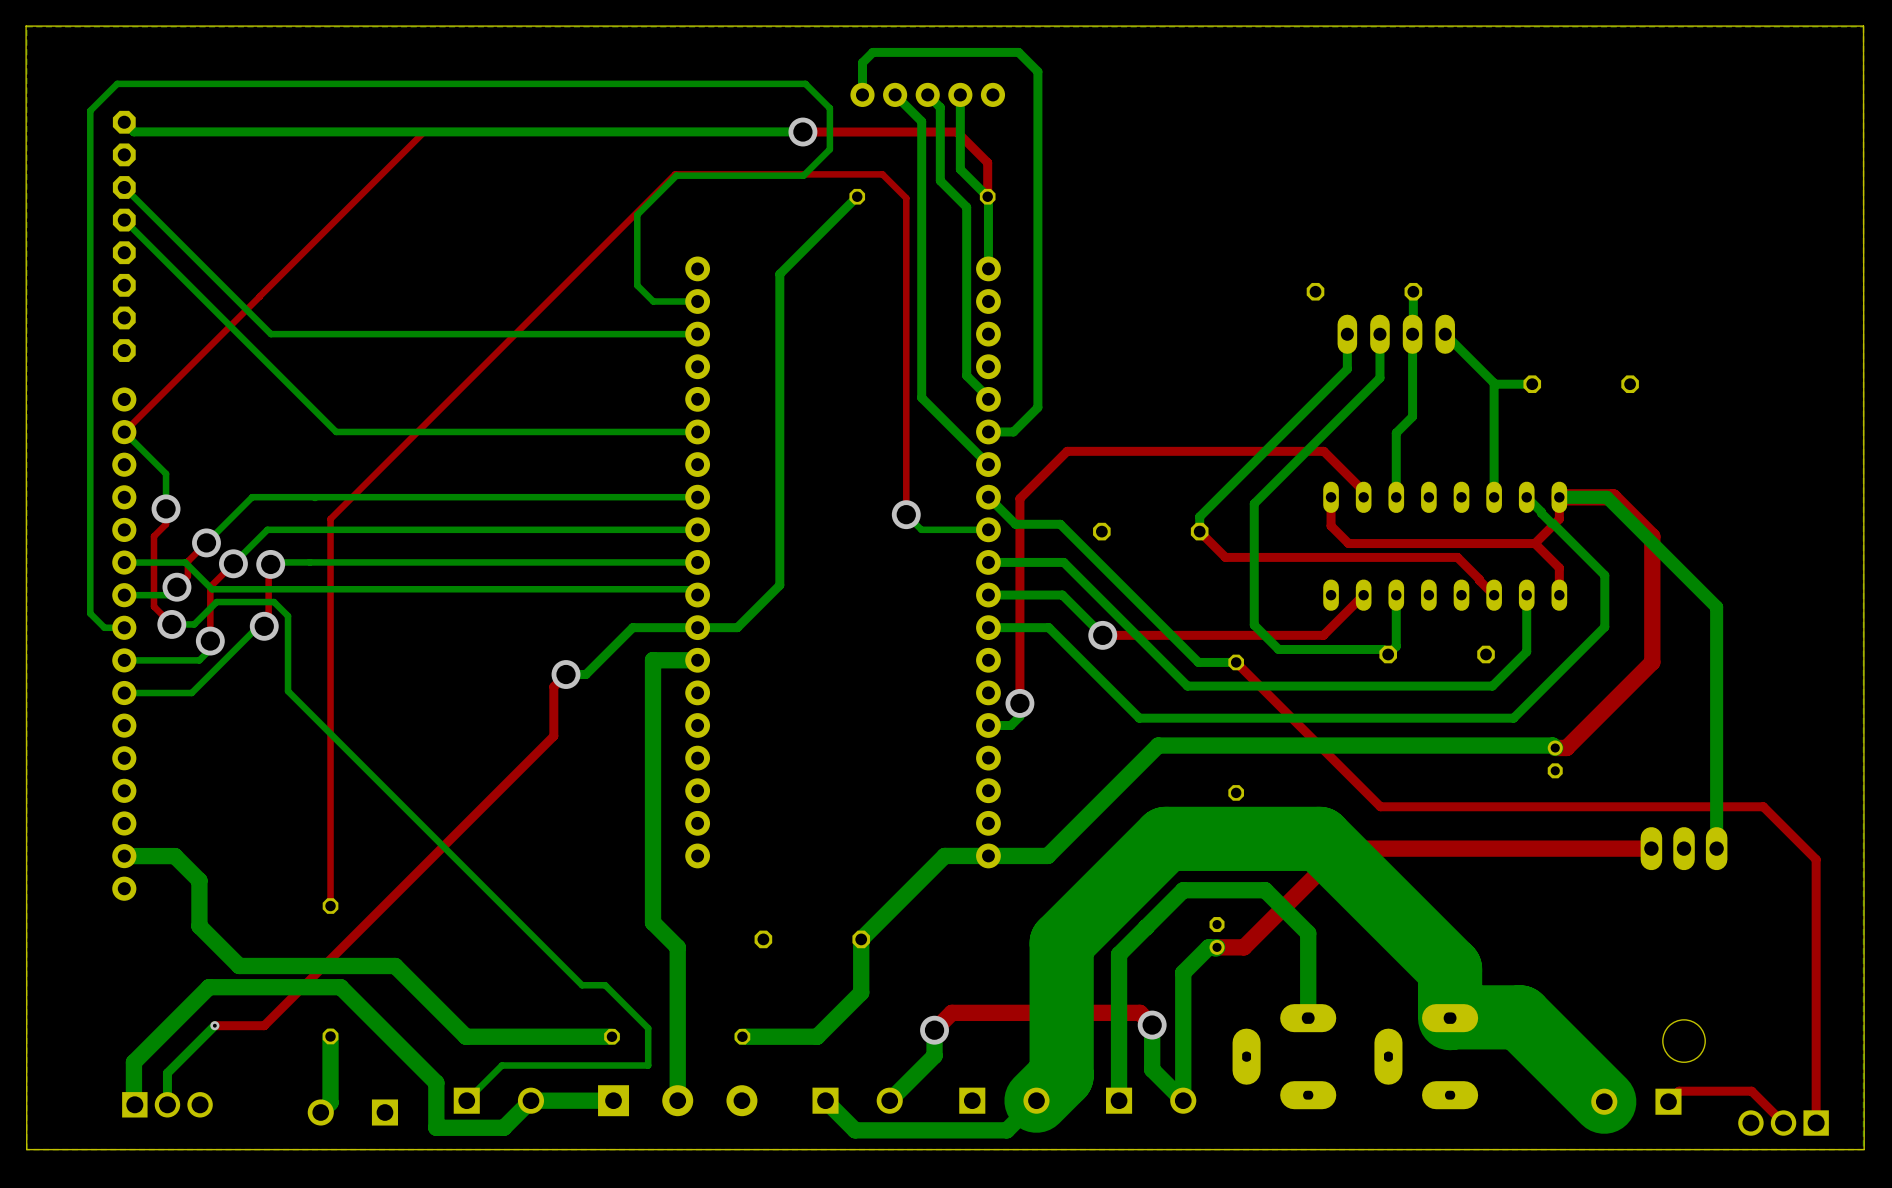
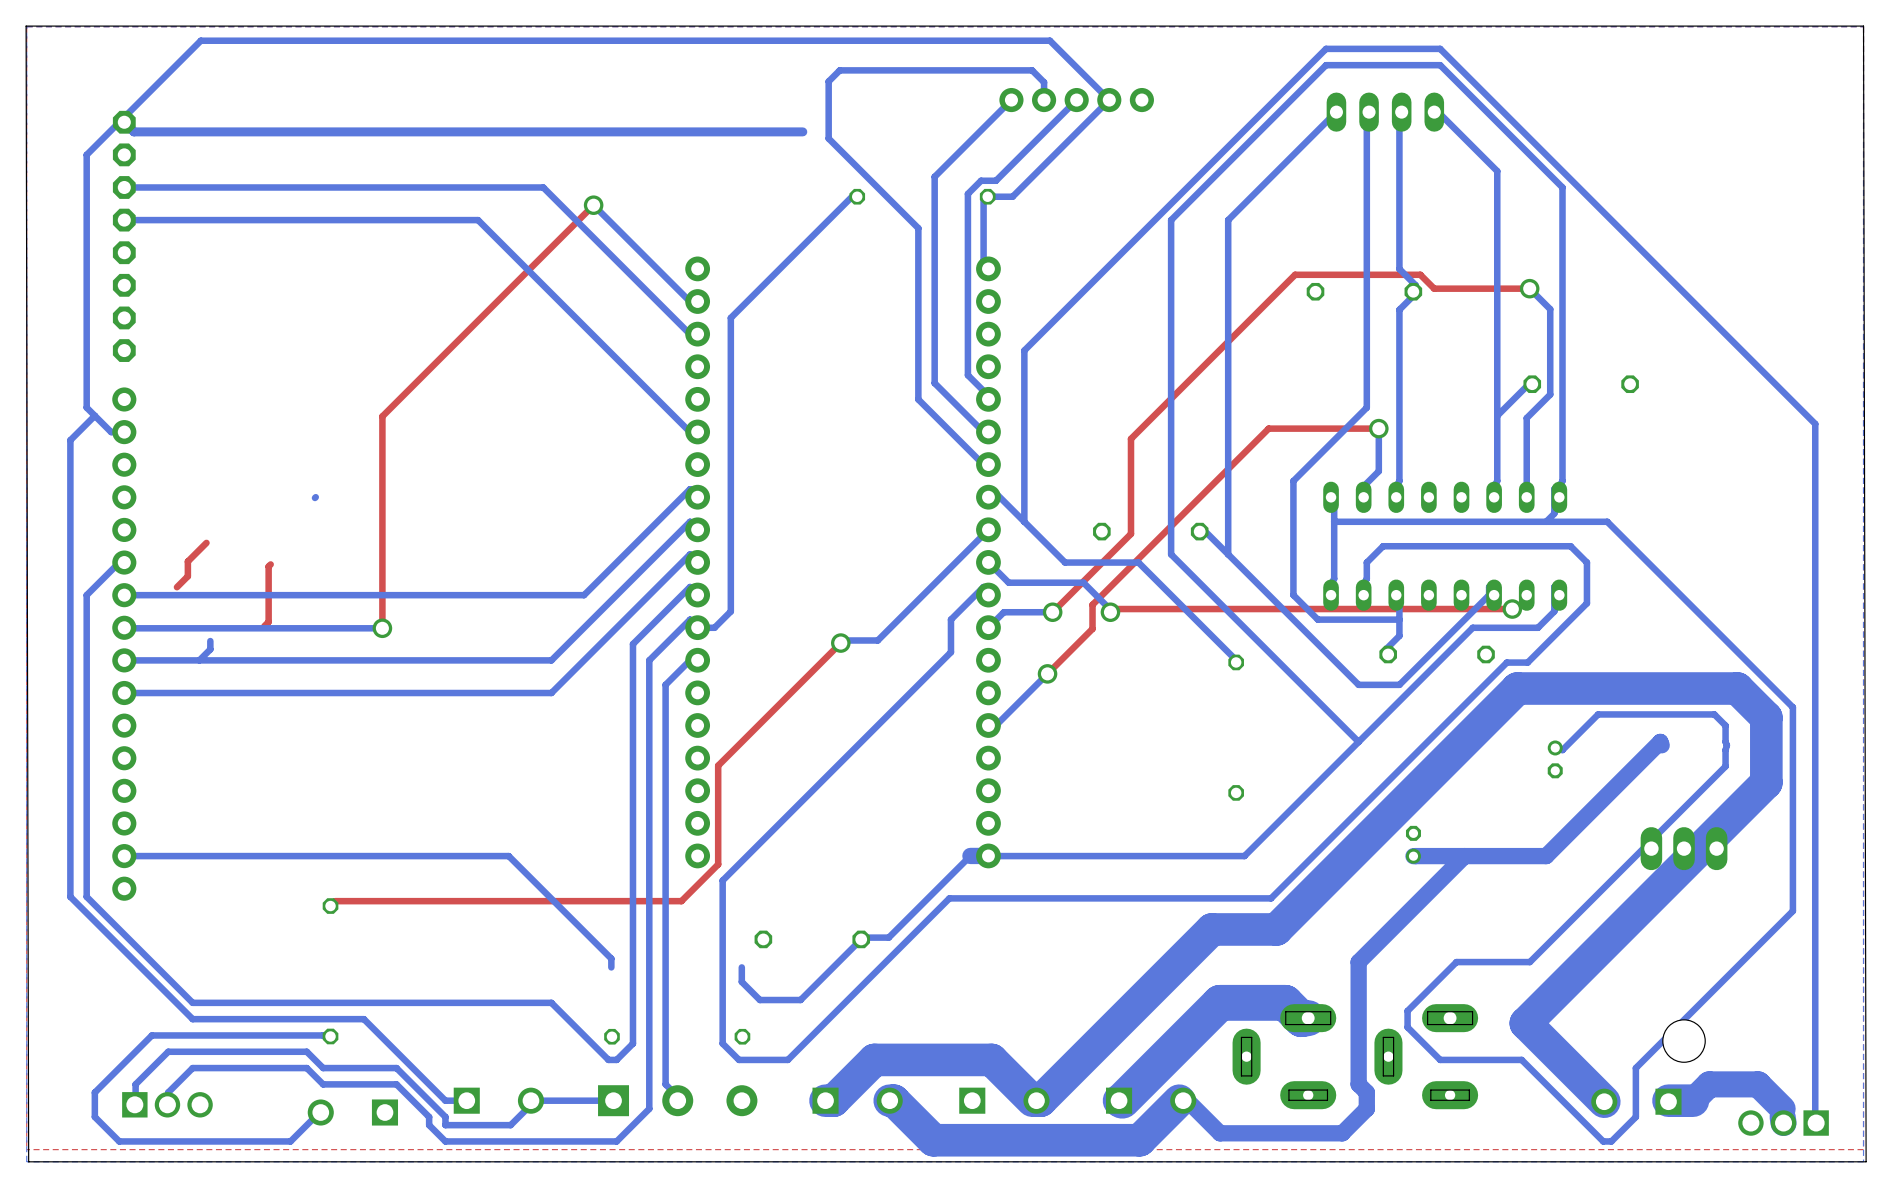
board edge: (1863, 26) (1864, 1149) (26, 1149) (26, 26) -> (1863, 26) (1866, 1161) (28, 1161) (26, 26)
bottom track: (862, 94) (862, 62) (872, 52) (1018, 52) (1037, 71) (1037, 407) (1013, 431) (988, 431) -> (1011, 100) (934, 176) (934, 383) (983, 432) (988, 431)
bottom track: (895, 94) (921, 121) (921, 397) (988, 464) -> (1044, 100) (1044, 82) (1032, 70) (839, 70) (828, 81) (828, 138) (918, 228) (918, 399) (983, 464) (988, 464)
bottom track: (927, 94) (940, 107) (940, 180) (966, 207) (966, 375) (988, 397) -> (1076, 100) (995, 180) (981, 180) (967, 193) (967, 375) (988, 397)
part position: (927, 94) -> (1076, 100)
bottom track: (960, 94) (960, 169) (988, 197) (988, 268) -> none
bottom track: none -> (1336, 112) (1228, 220) (1228, 554)
bottom track: none -> (1369, 112) (1366, 114) (1366, 407) (1293, 481) (1293, 595) (1317, 619) (1399, 619)
bottom track: none -> (1401, 112) (1399, 114) (1399, 269) (1415, 285) (1413, 291) (1415, 293) (1399, 309) (1399, 481) (1396, 486)
bottom track: none -> (1434, 112) (1440, 114) (1497, 171) (1497, 481) (1494, 486)
via: (802, 132) -> none
bottom track: (124, 187) (270, 334) (697, 334) -> (124, 187) (543, 187) (690, 334) (697, 334)
bottom track: (857, 196) (779, 274) (779, 585) (737, 627) (632, 627) (585, 674) (566, 674) -> (857, 196) (853, 195) (730, 317) (730, 611) (714, 627) (697, 627) (690, 619) (649, 660) (649, 1108) (616, 1141) (445, 1141) (429, 1125) (429, 1117) (396, 1084) (323, 1084) (306, 1068) (192, 1068) (168, 1092) (167, 1104)
top track: (987, 196) (987, 162) (957, 132) (424, 132) (259, 296) -> none
bottom track: none -> (593, 205) (689, 301)
top track: none -> (593, 205) (382, 416) (382, 628)
via: none -> (593, 205)
bottom track: (124, 220) (336, 431) (697, 431) -> (124, 220) (478, 220) (690, 432) (697, 431)
bottom track: none -> (1529, 288) (1550, 309) (1550, 394) (1526, 418) (1526, 486)
top track: none -> (1529, 288) (1434, 288) (1420, 274) (1295, 274) (1130, 438) (1130, 533) (1052, 612)
via: none -> (1529, 288)
bottom track: (1413, 291) (1412, 416) (1396, 432) (1396, 497) -> none
top track: (259, 296) (124, 432) -> none
bottom track: (689, 301) (653, 301) (637, 285) (637, 214) (676, 175) (803, 175) (829, 149) (829, 108) (805, 83) (117, 83) (90, 110) (90, 613) (104, 627) (124, 627) -> (382, 628) (124, 627)
bottom track: (1347, 334) (1347, 369) (1199, 516) (1199, 531) -> (1494, 584) (1489, 587) (1489, 595) (1399, 684) (1358, 684) (1203, 529) (1199, 531)
bottom track: (1379, 334) (1379, 378) (1254, 503) (1254, 625) (1278, 649) (1383, 649) (1388, 654) (1396, 646) (1396, 595) -> none
part position: (1396, 334) -> (1385, 112)
bottom track: (1445, 334) (1495, 384) (1532, 384) -> (1497, 415) (1529, 383) (1532, 384)
bottom track: (1494, 383) (1494, 497) -> none
bottom track: none -> (1378, 428) (1378, 471) (1363, 486)
top track: none -> (1378, 428) (1268, 428) (1092, 604) (1092, 628) (1047, 673)
via: none -> (1378, 428)
bottom track: (124, 432) (166, 473) (166, 508) -> (124, 432) (111, 432) (86, 407) (86, 154) (200, 40) (1049, 40) (1109, 100) (1012, 196) (983, 195) (983, 260) (988, 268)
bottom track: none -> (1331, 486) (1334, 489) (1334, 578) (1331, 584)
bottom track: (697, 497) (252, 497) (206, 542) -> (697, 497) (690, 489) (584, 595) (168, 595)
bottom track: (988, 497) (1015, 524) (1060, 524) (1198, 662) (1236, 662) -> (988, 497) (991, 489) (1065, 562) (1138, 562) (1236, 660) (1236, 662)
top track: (1331, 497) (1331, 525) (1348, 543) (1534, 543) -> none
top track: (1363, 497) (1363, 491) (1323, 451) (1067, 451) (1019, 498) (1019, 703) -> none
bottom track: (1526, 497) (1604, 575) (1604, 627) (1513, 718) (1139, 718) (1048, 627) (988, 627) -> (1052, 612) (1003, 612) (988, 627)
bottom track: (1559, 497) (1606, 497) (1716, 607) (1716, 848) -> none
top track: (166, 508) (166, 524) (154, 536) (154, 606) (171, 624) -> none
via: (166, 508) -> none
bottom track: (906, 514) (921, 529) (988, 529) -> (840, 643) (843, 640) (877, 640) (988, 529)
top track: (906, 514) (906, 198) (882, 174) (675, 174) (330, 519) (330, 906) -> (840, 643) (718, 765) (718, 864) (681, 901) (335, 901) (330, 906)
via: (906, 514) -> none
bottom track: none -> (1024, 521) (1024, 350) (1326, 48) (1440, 48) (1815, 423) (1816, 1123)
bottom track: none -> (1334, 521) (1607, 521) (1792, 707) (1792, 911) (1635, 1068) (1635, 1117) (1611, 1141) (1603, 1141) (1521, 1059) (1440, 1059) (1407, 1027) (1407, 1011) (1456, 962) (1529, 962) (1725, 766) (1725, 725) (1714, 714) (1598, 714) (1562, 750) (1555, 747)
bottom track: none -> (1546, 521) (1554, 513) (1554, 489) (1559, 486) (1562, 481) (1562, 187) (1440, 65) (1326, 65) (1171, 220) (1171, 554) (1358, 741)
bottom track: (697, 529) (267, 529) (233, 563) -> (697, 529) (690, 521) (551, 660) (199, 660)
top track: (1199, 531) (1225, 557) (1457, 557) (1494, 595) -> none
via: (206, 542) -> none
top track: (1534, 543) (1559, 567) (1559, 595) -> none
top track: (1534, 543) (1559, 519) (1559, 497) (1613, 497) (1652, 536) (1652, 662) (1566, 747) (1555, 747) -> none
bottom track: (124, 562) (185, 562) (212, 589) (691, 589) (697, 595) -> (124, 562) (119, 562) (86, 595) (86, 896) (192, 1002) (551, 1002) (608, 1059) (616, 1059) (632, 1043) (632, 644) (690, 587) (697, 595)
bottom track: (697, 562) (281, 562) (279, 564) (270, 564) -> (697, 562) (690, 554) (551, 693) (191, 693)
bottom track: (988, 562) (1063, 562) (1187, 686) (1492, 686) (1526, 651) (1526, 595) -> (988, 562) (1008, 582) (1083, 582) (1110, 609) (1110, 612)
top track: (233, 563) (210, 586) (210, 641) -> none
via: (233, 563) -> none
via: (270, 564) -> none
bottom track: none -> (1396, 584) (1399, 587) (1399, 635) (1383, 652) (1388, 654)
via: (176, 587) -> none
bottom track: (988, 595) (1062, 595) (1102, 635) -> (988, 595) (983, 587) (950, 619) (950, 652) (722, 880) (722, 1043) (738, 1059) (787, 1059) (949, 898) (1271, 898) (1506, 662) (1527, 662) (1586, 603) (1586, 562) (1570, 546) (1383, 546) (1366, 562) (1366, 578) (1363, 584)
top track: (1363, 595) (1323, 635) (1102, 635) -> none
top track: none -> (1512, 609) (1113, 609) (1110, 612)
via: none -> (1512, 609)
via: none -> (1052, 612)
via: none -> (1110, 612)
bottom track: (171, 624) (194, 624) (216, 602) (274, 602) (288, 616) (288, 691) (582, 985) (605, 985) (648, 1028) (648, 1065) (501, 1065) (466, 1100) -> (94, 415) (70, 440) (70, 896) (192, 1019) (363, 1019) (445, 1100) (466, 1100)
via: (171, 624) -> none
bottom track: (264, 626) (258, 626) (191, 693) -> none
via: (264, 626) -> none
via: none -> (382, 628)
via: (1102, 635) -> none
via: (210, 641) -> none
via: none -> (840, 643)
bottom track: (697, 660) (653, 660) (653, 922) (677, 947) (677, 1100) -> (697, 660) (690, 660) (665, 684) (665, 1084) (681, 1100) (677, 1100)
top track: (1236, 662) (1380, 806) (1763, 806) (1816, 859) (1816, 1123) -> none
via: none -> (1047, 673)
top track: (566, 674) (553, 686) (553, 736) (264, 1025) (214, 1025) -> none
via: (566, 674) -> none
bottom track: (1019, 703) (1019, 716) (1010, 725) (995, 725) -> (1047, 673) (995, 725)
via: (1019, 703) -> none
bottom track: none -> (1661, 745) (1660, 741) (1546, 856) (1413, 856)
bottom track: (1555, 747) (1552, 745) (1158, 745) (1047, 855) (988, 855) -> (1559, 584) (1554, 587) (1554, 611) (1538, 627) (1472, 627) (1244, 856) (988, 855)
top track: (1651, 848) (1342, 848) (1243, 947) (1217, 947) -> none
bottom track: (970, 855) (944, 855) (861, 939) (861, 992) (817, 1036) (742, 1036) -> (970, 855) (888, 937) (861, 937) (800, 1000) (759, 1000) (741, 981) (741, 967)
bottom track: (174, 856) (199, 880) (199, 926) (239, 965) (395, 965) (465, 1036) (611, 1036) -> (174, 856) (508, 856) (611, 958) (611, 967)
bottom track width: thick (174, 856) (124, 856) -> thin (174, 856) (124, 856)
part position: (1217, 935) -> (1413, 844)
bottom track: (1215, 948) (1217, 947) (1208, 947) (1183, 972) (1183, 1100) (1152, 1069) (1152, 1025) -> none
bottom track: (1308, 1018) (1308, 933) (1265, 890) (1183, 890) (1119, 954) (1119, 1100) -> (1308, 1018) (1301, 1019) (1285, 1002) (1220, 1002) (1122, 1100) (1119, 1100)
bottom track: (1521, 1019) (1519, 1017) (1450, 1018) (1450, 969) (1319, 838) (1165, 838) (1061, 942) (1061, 1075) (1006, 1130) (855, 1130) (825, 1100) -> (1525, 1023) (1766, 782) (1766, 717) (1737, 688) (1517, 688) (1276, 929) (1211, 929) (1040, 1100) (1032, 1100) (991, 1059) (874, 1059) (833, 1100) (825, 1100)
bottom track width: thick (1521, 1019) (1604, 1101) -> thin (1521, 1019) (1604, 1101)
bottom track: (214, 1025) (167, 1073) (167, 1104) -> none
via: (214, 1025) -> none
top track: (1152, 1025) (1139, 1012) (951, 1012) (934, 1030) -> none
via: (1152, 1025) -> none
bottom track: (934, 1030) (934, 1055) (889, 1100) -> (1464, 856) (1358, 962) (1358, 1084) (1366, 1092) (1366, 1108) (1342, 1133) (1220, 1133) (1187, 1100) (1179, 1100) (1139, 1140) (933, 1140) (893, 1100) (889, 1100)
via: (934, 1030) -> none
bottom track: (330, 1036) (330, 1102) (320, 1112) -> (330, 1036) (151, 1035) (94, 1092) (94, 1117) (119, 1141) (290, 1141) (320, 1112)
bottom track: (530, 1100) (503, 1127) (436, 1127) (436, 1082) (340, 987) (209, 987) (133, 1062) (134, 1104) -> (535, 1100) (510, 1125) (445, 1125) (445, 1117) (396, 1068) (323, 1068) (306, 1051) (168, 1051) (135, 1084) (134, 1104)
bottom track width: thick (613, 1100) (530, 1100) -> thin (613, 1100) (530, 1100)
bottom track: none -> (1668, 1101) (1692, 1100) (1709, 1084) (1758, 1084) (1782, 1108) (1783, 1123)
top track: (1668, 1101) (1679, 1091) (1751, 1091) (1783, 1123) -> none

